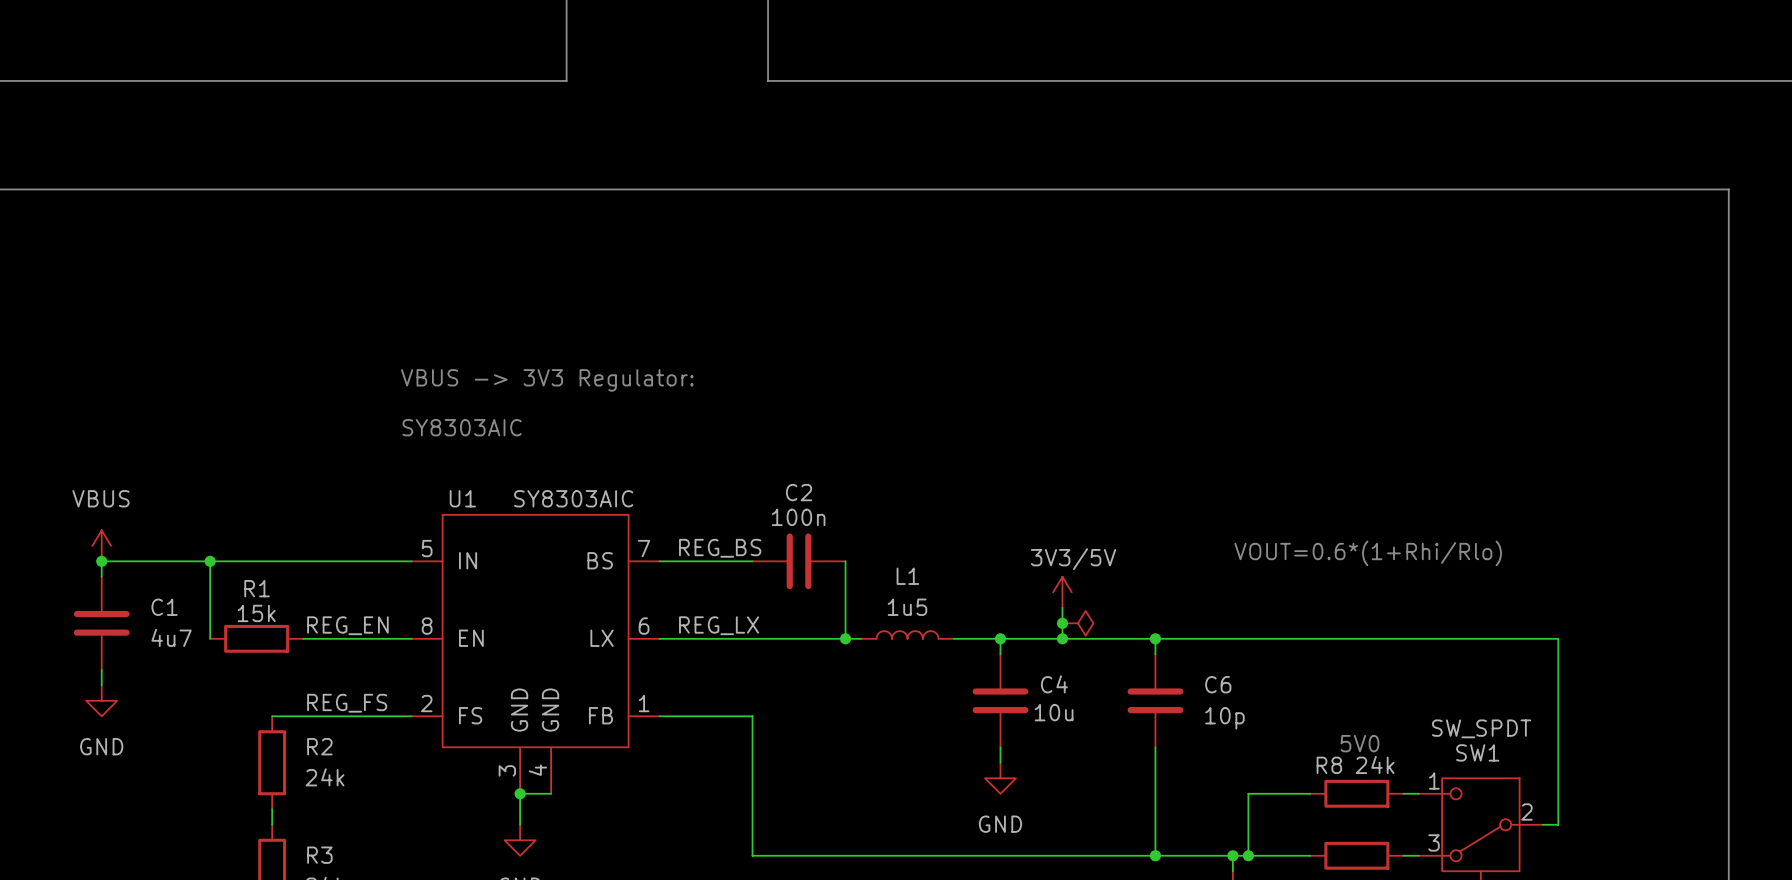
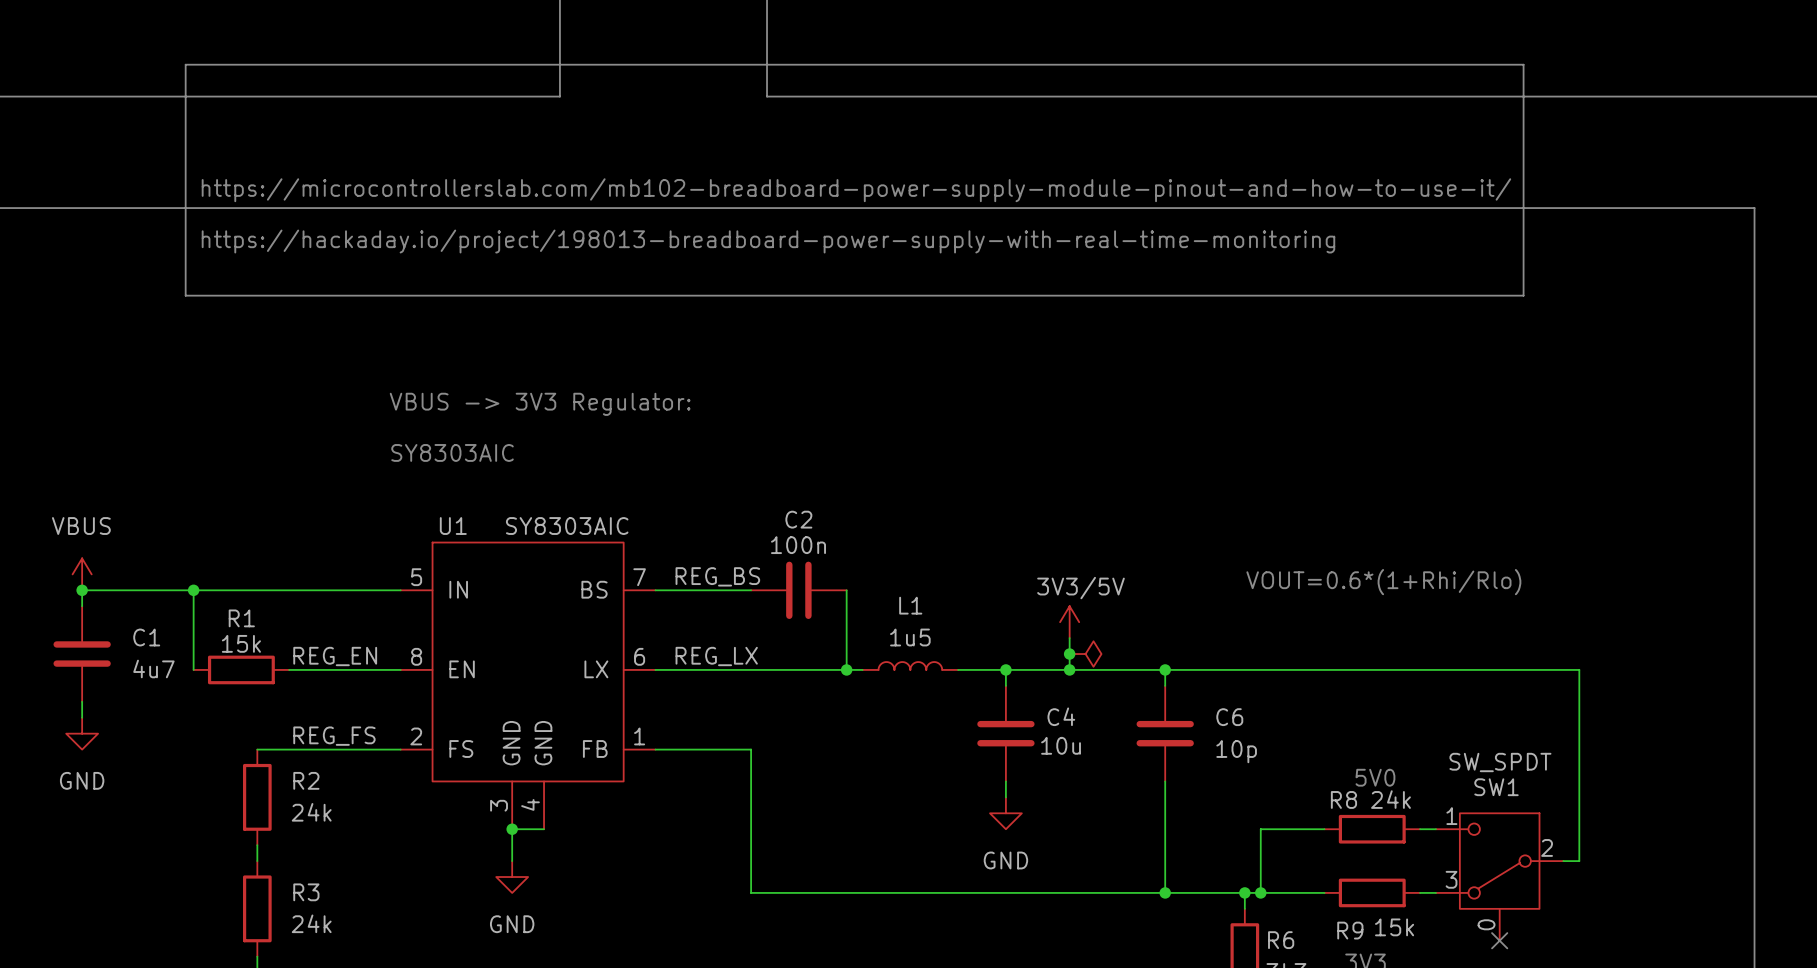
line: none -> (185, 64) (185, 295) (1523, 295) (1523, 64) (185, 64)
text: none -> https://microcontrollerslab.com/mb102-breadboard-power-supply-module-pinout-and-how-to-use-it/ (856, 190)
text: none -> https://hackaday.io/project/198013-breadboard-power-supply-with-real-time-monitoring (768, 241)

